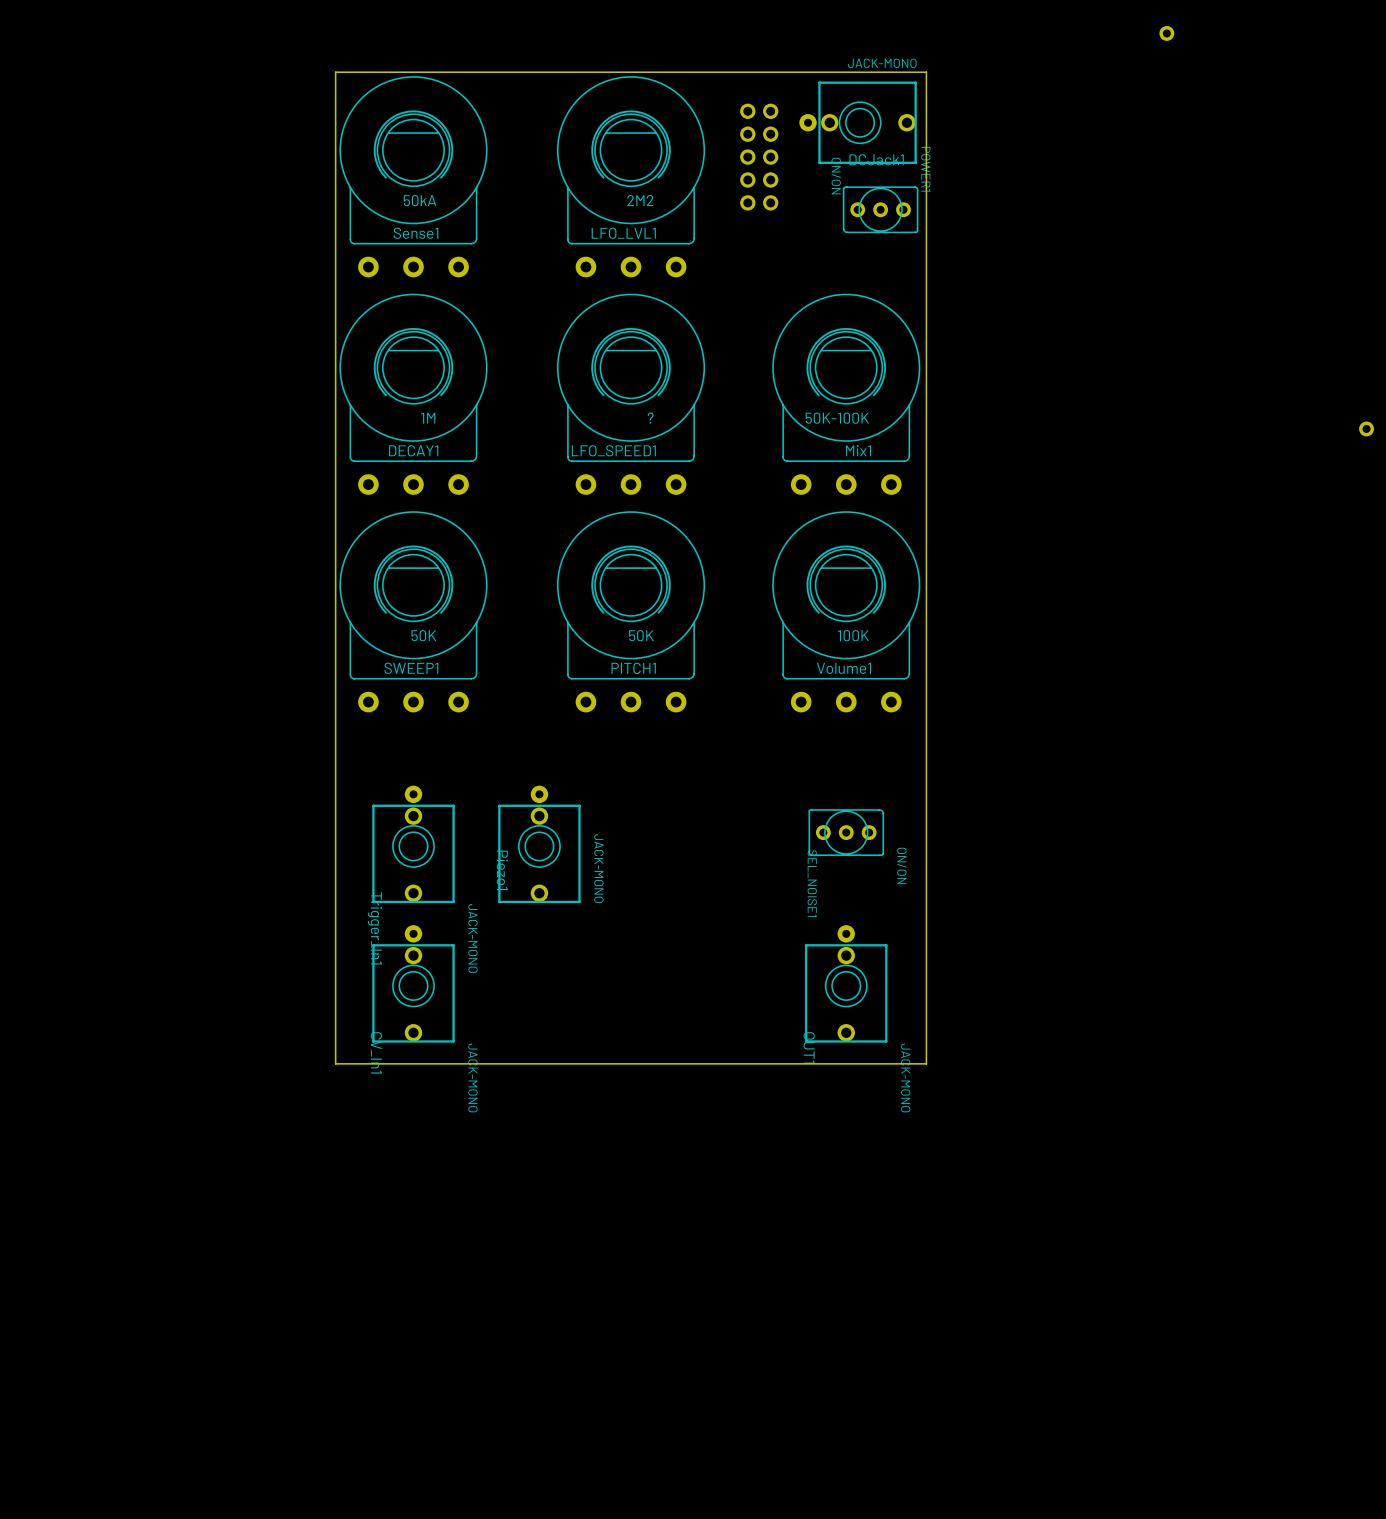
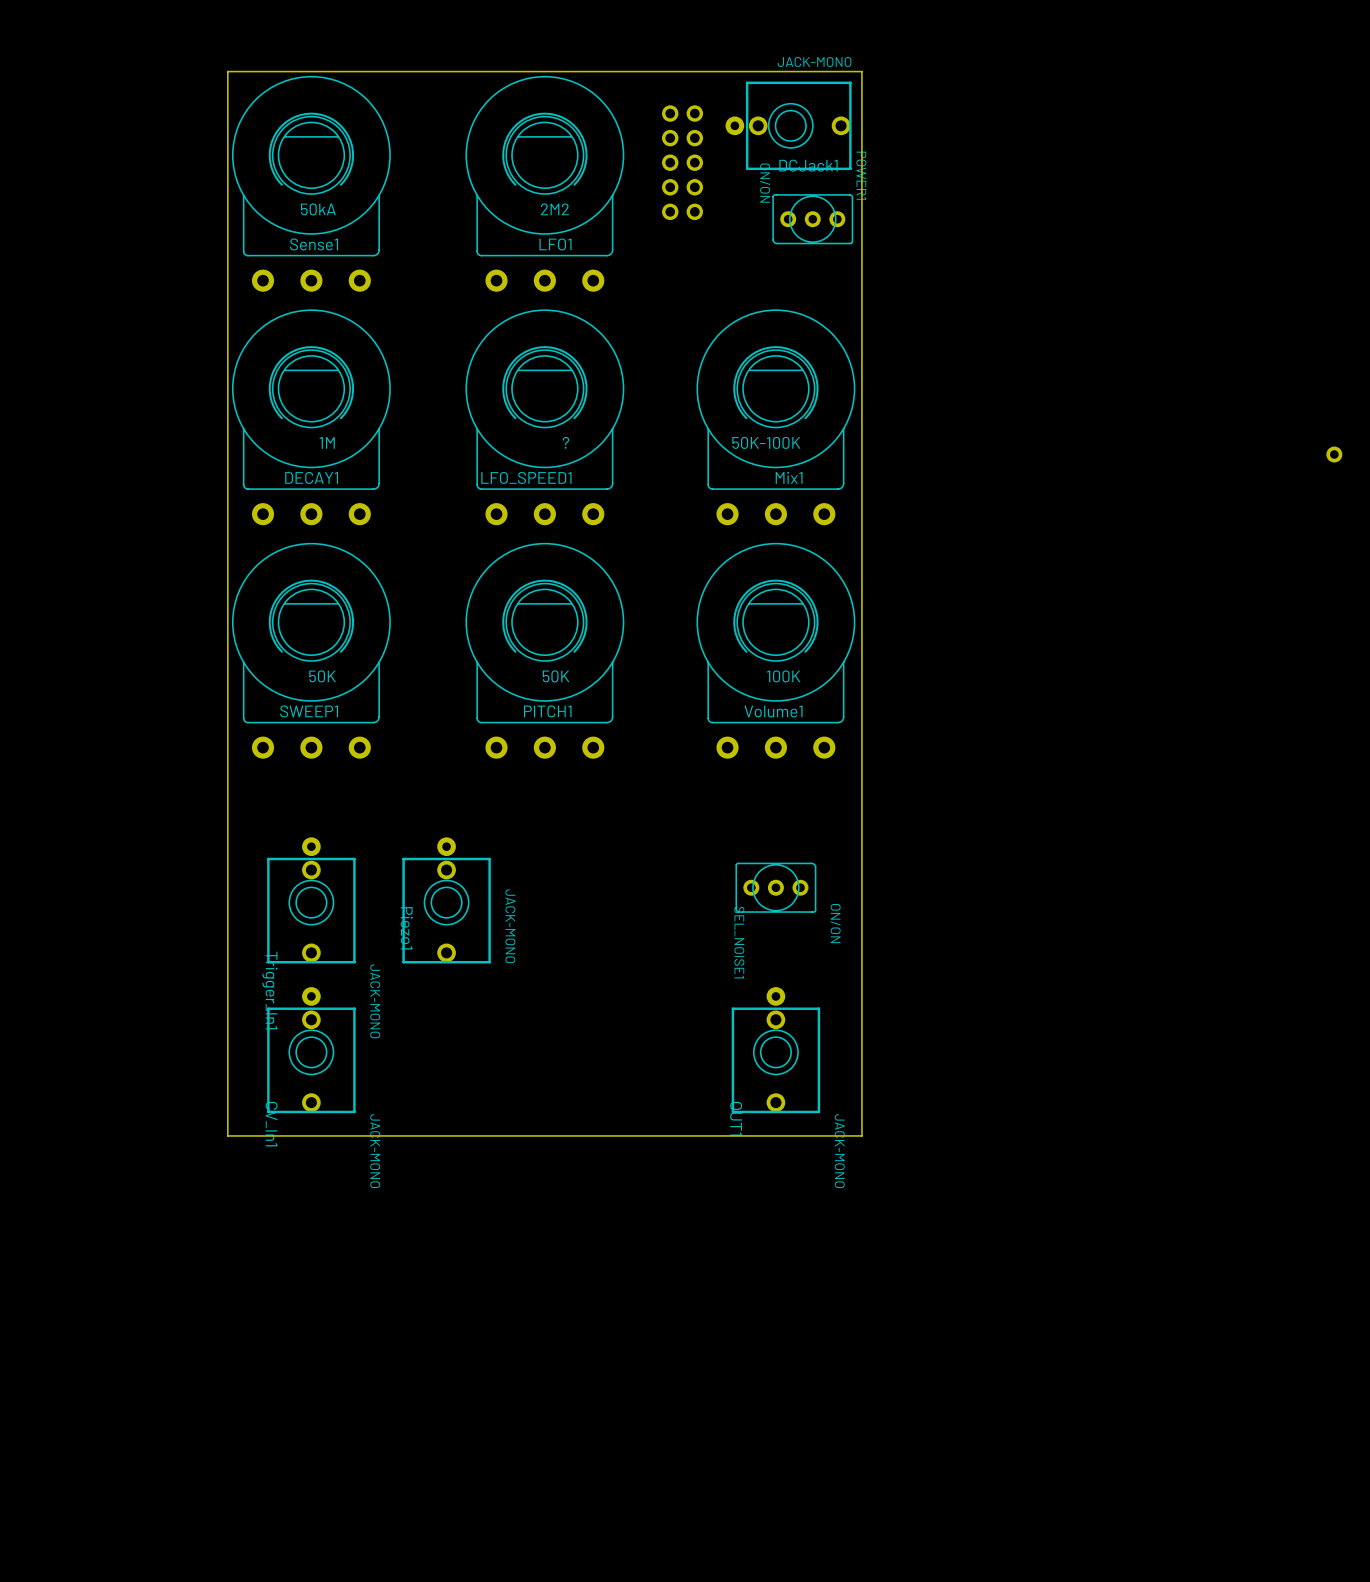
part: (1166, 33) -> none
LFO_LVL1 name: LFO_LVL1 (623, 233) -> LFO1 (555, 244)

